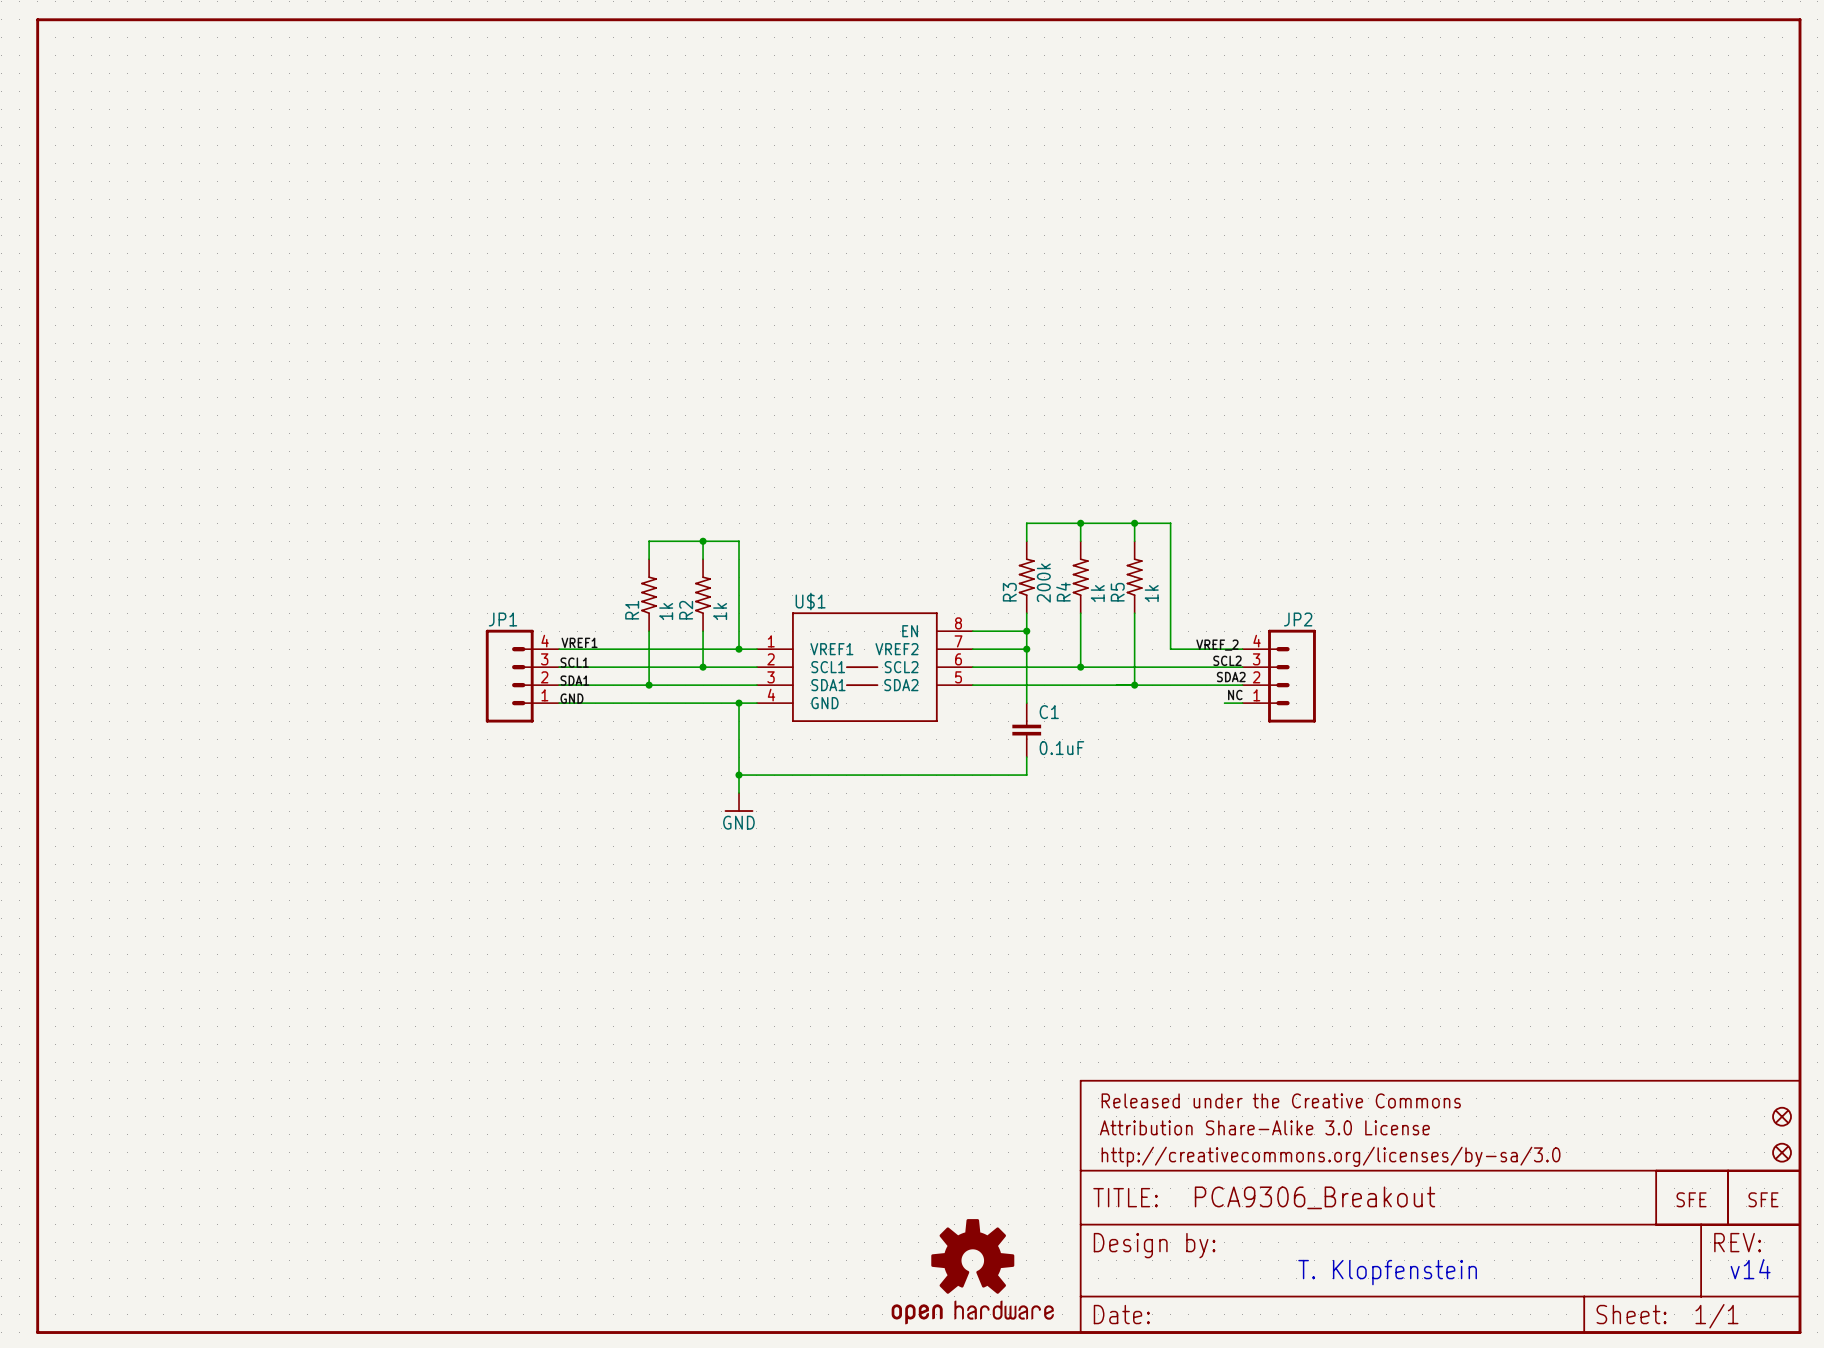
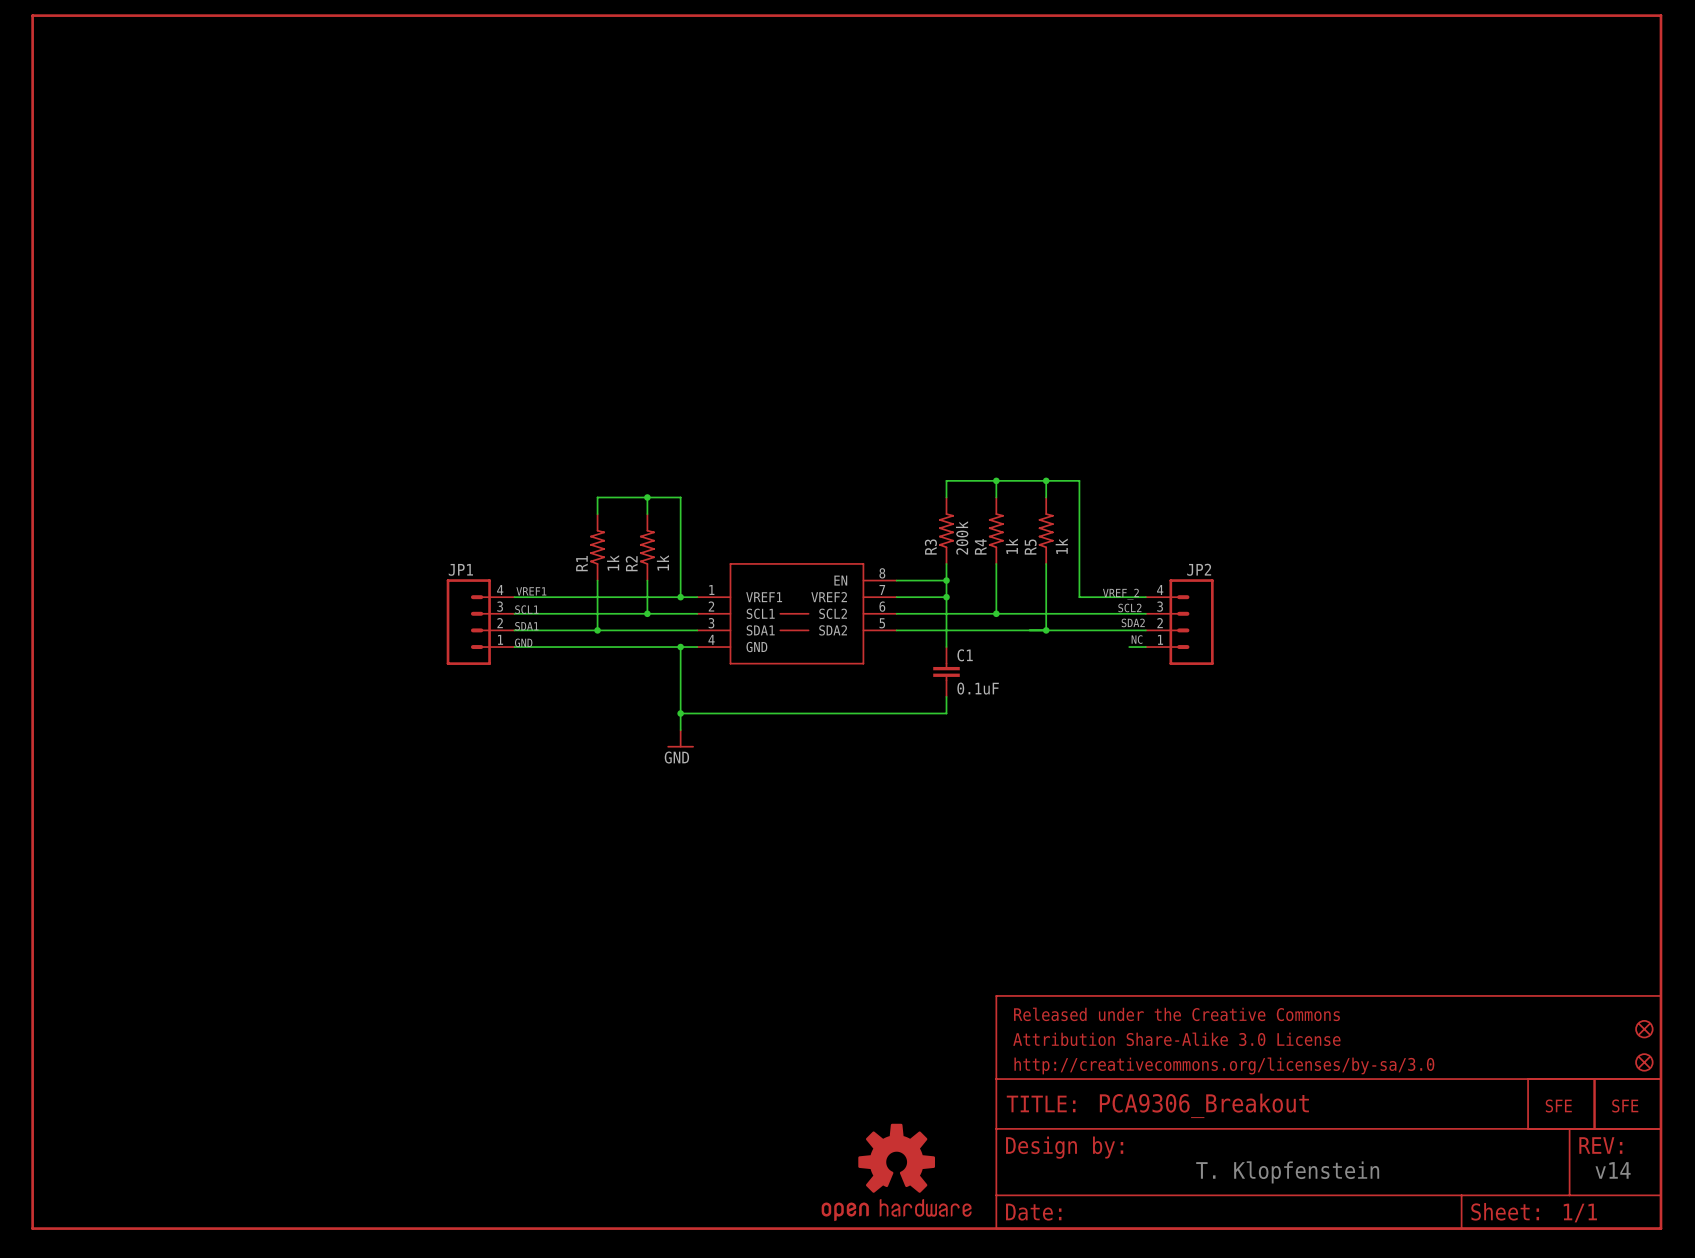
U$1 name: U$1 (810, 601) -> none

